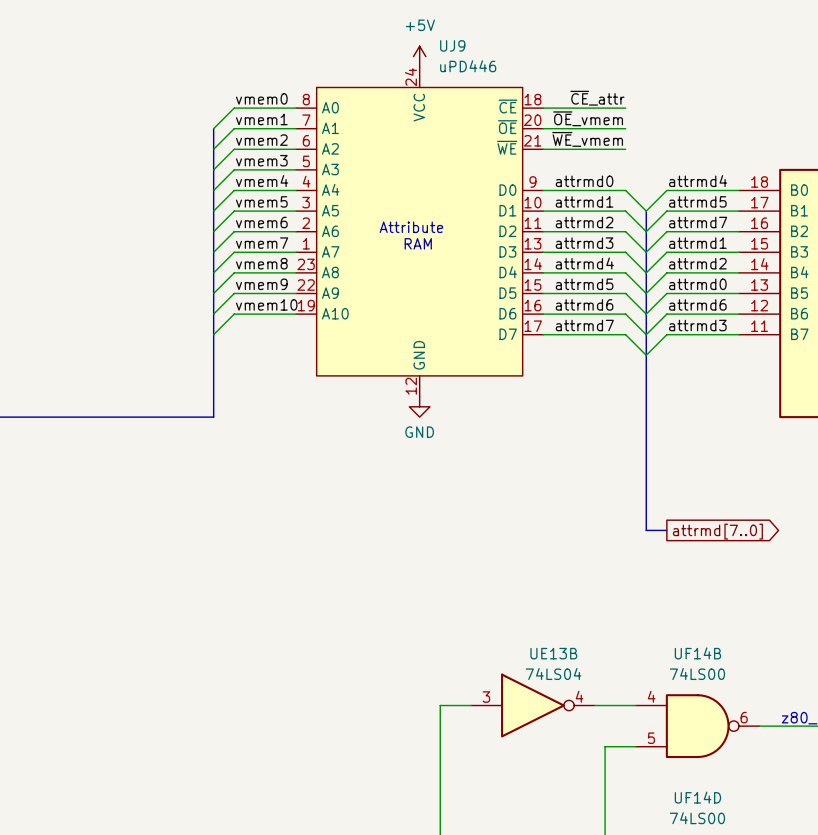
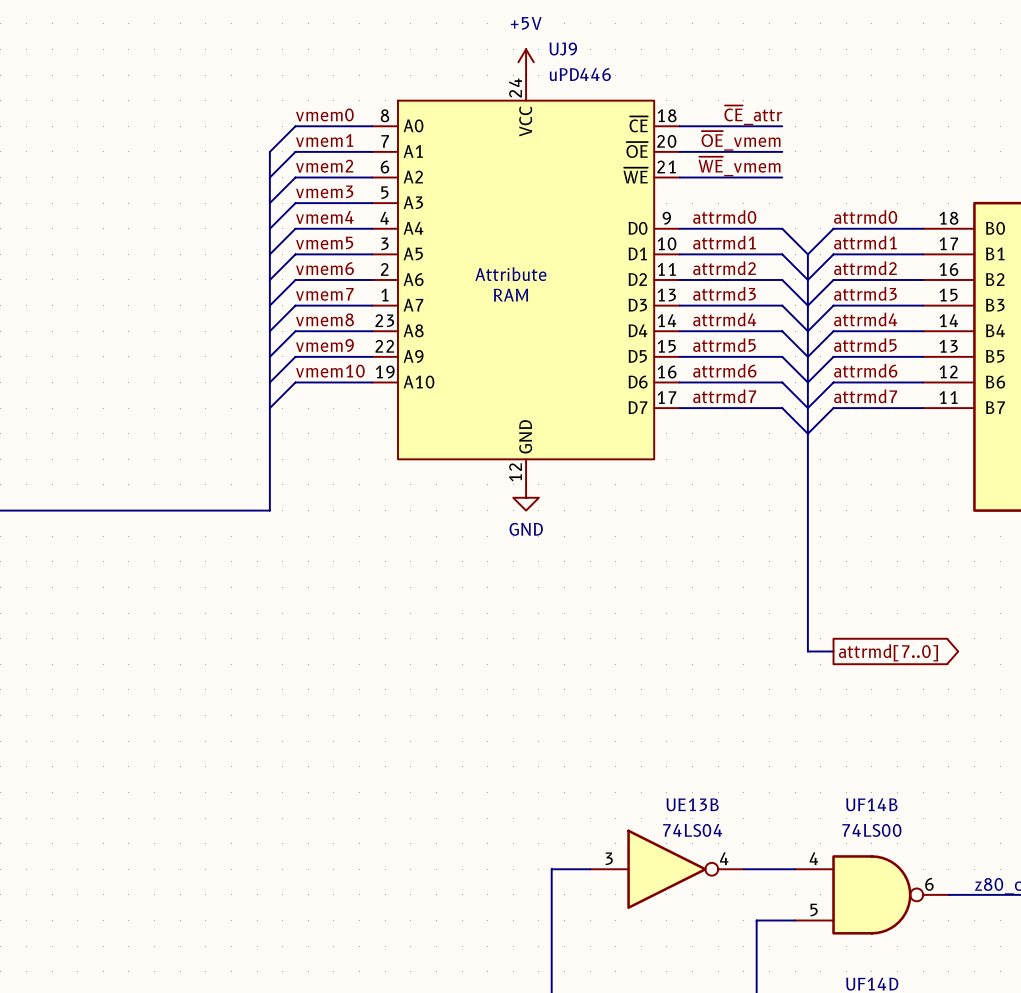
label: attrmd4 (698, 181) -> attrmd0 (865, 216)
label: attrmd5 (697, 201) -> attrmd1 (865, 242)
label: attrmd7 (698, 222) -> attrmd2 (865, 268)
label: attrmd1 (697, 243) -> attrmd3 (865, 293)
label: attrmd2 (697, 263) -> attrmd4 (865, 319)
label: attrmd0 (697, 284) -> attrmd5 (865, 345)
label: attrmd3 (697, 325) -> attrmd7 (865, 396)

